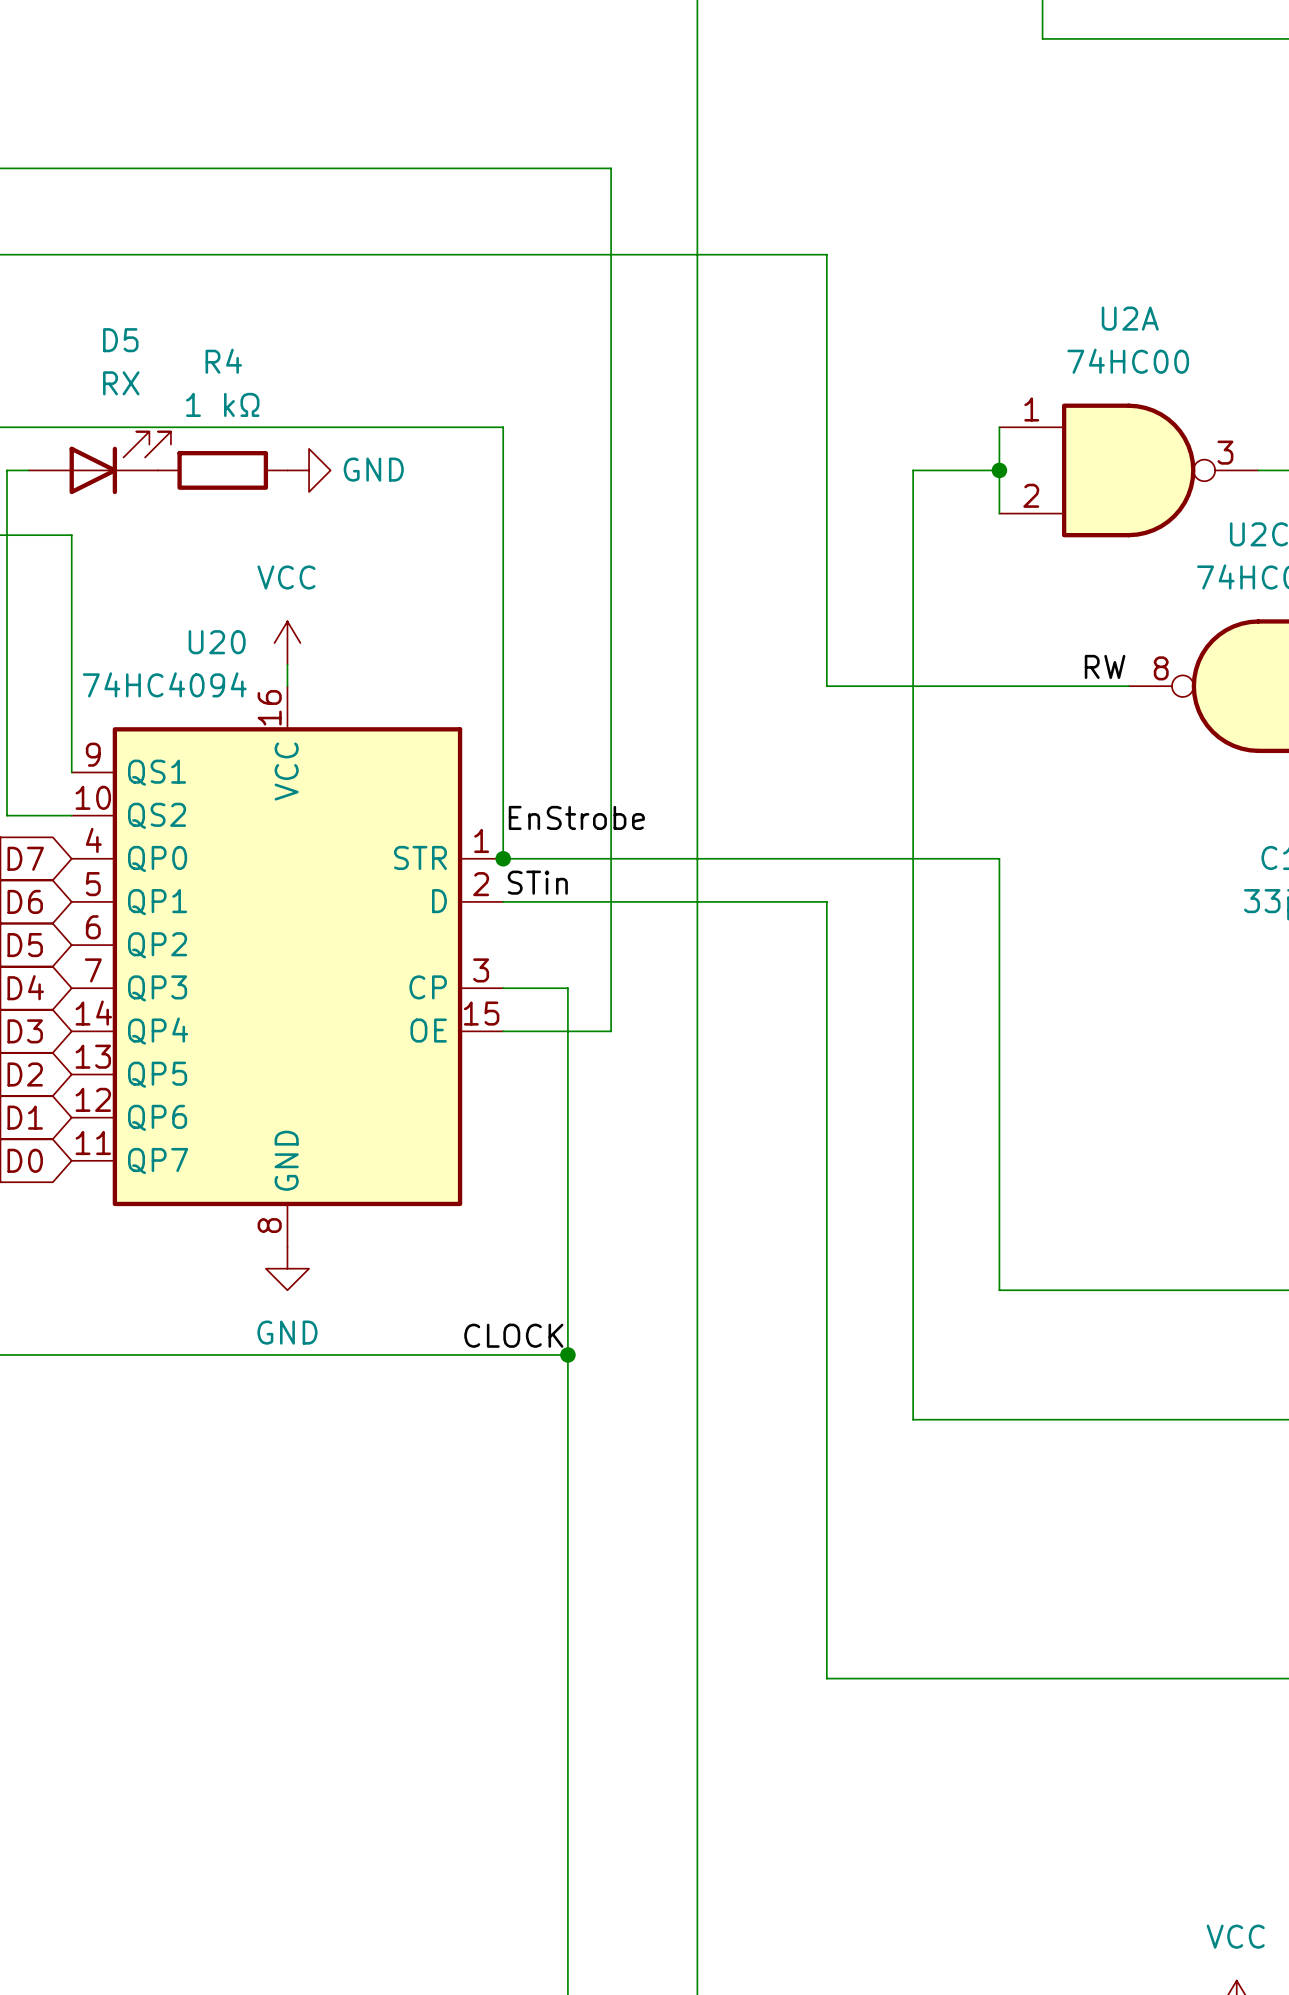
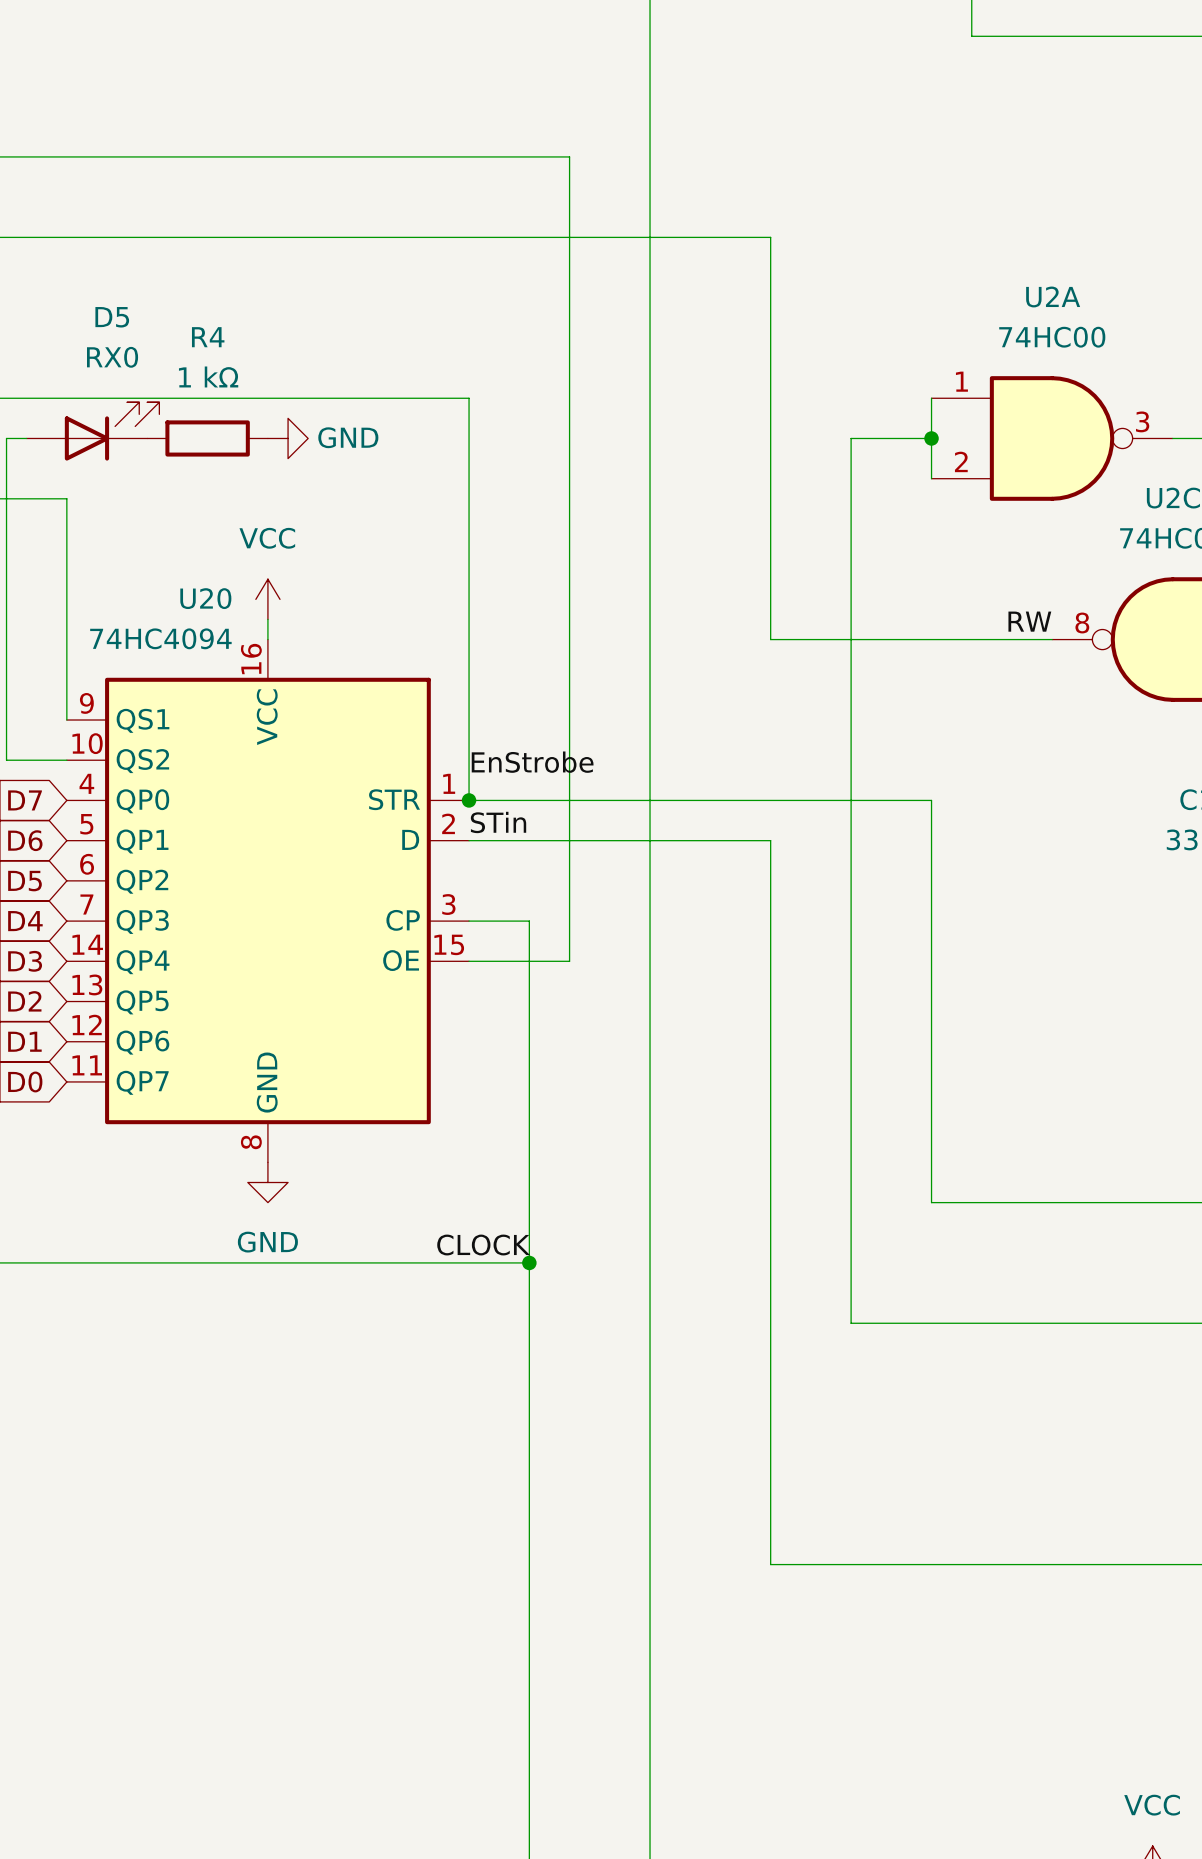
D5 value: RX (121, 383) -> RX0 (112, 357)

